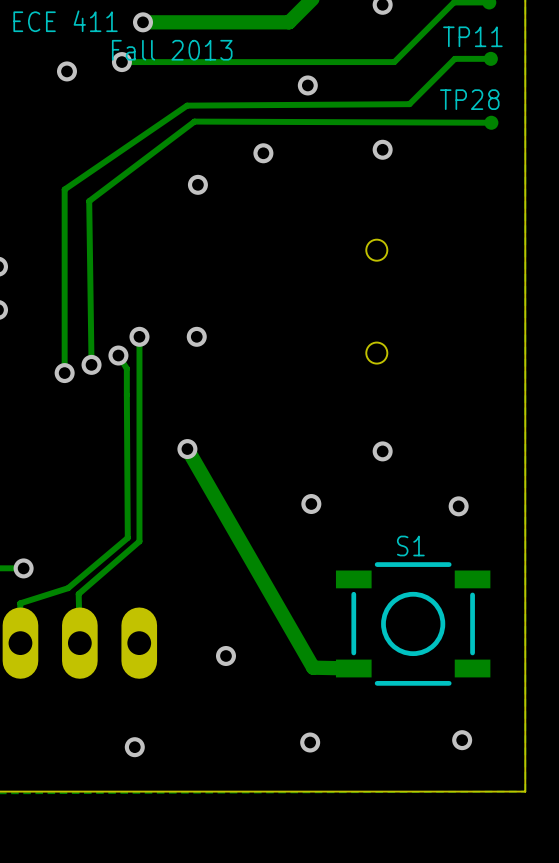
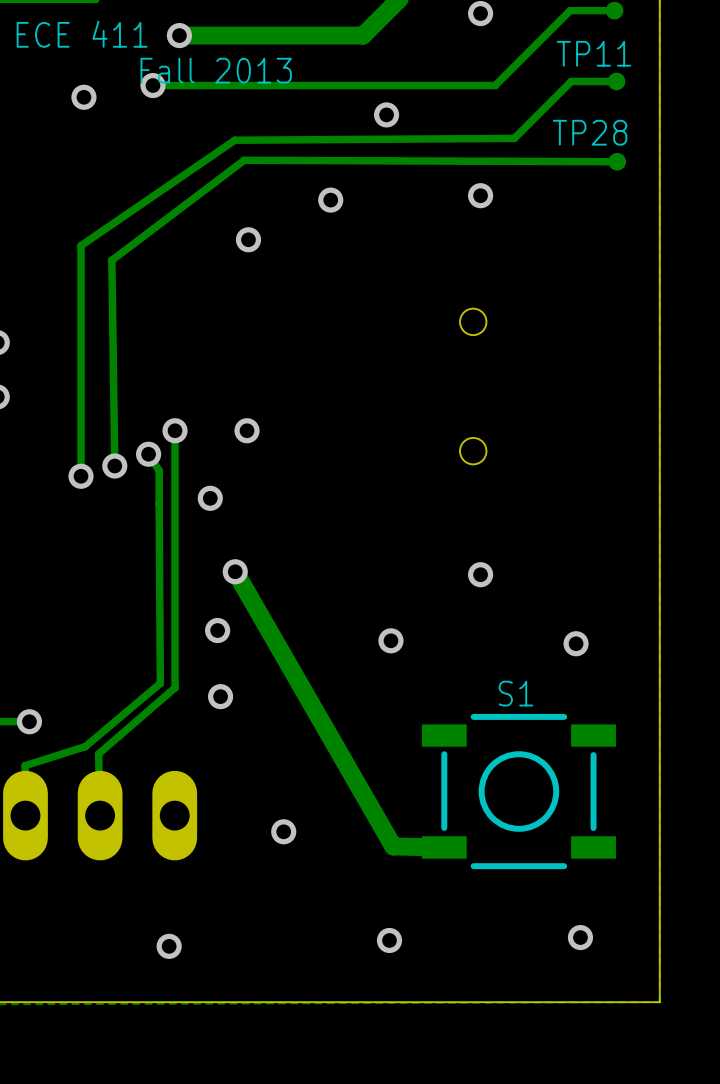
via: none -> (210, 498)
via: none -> (217, 630)
via: none -> (220, 696)

